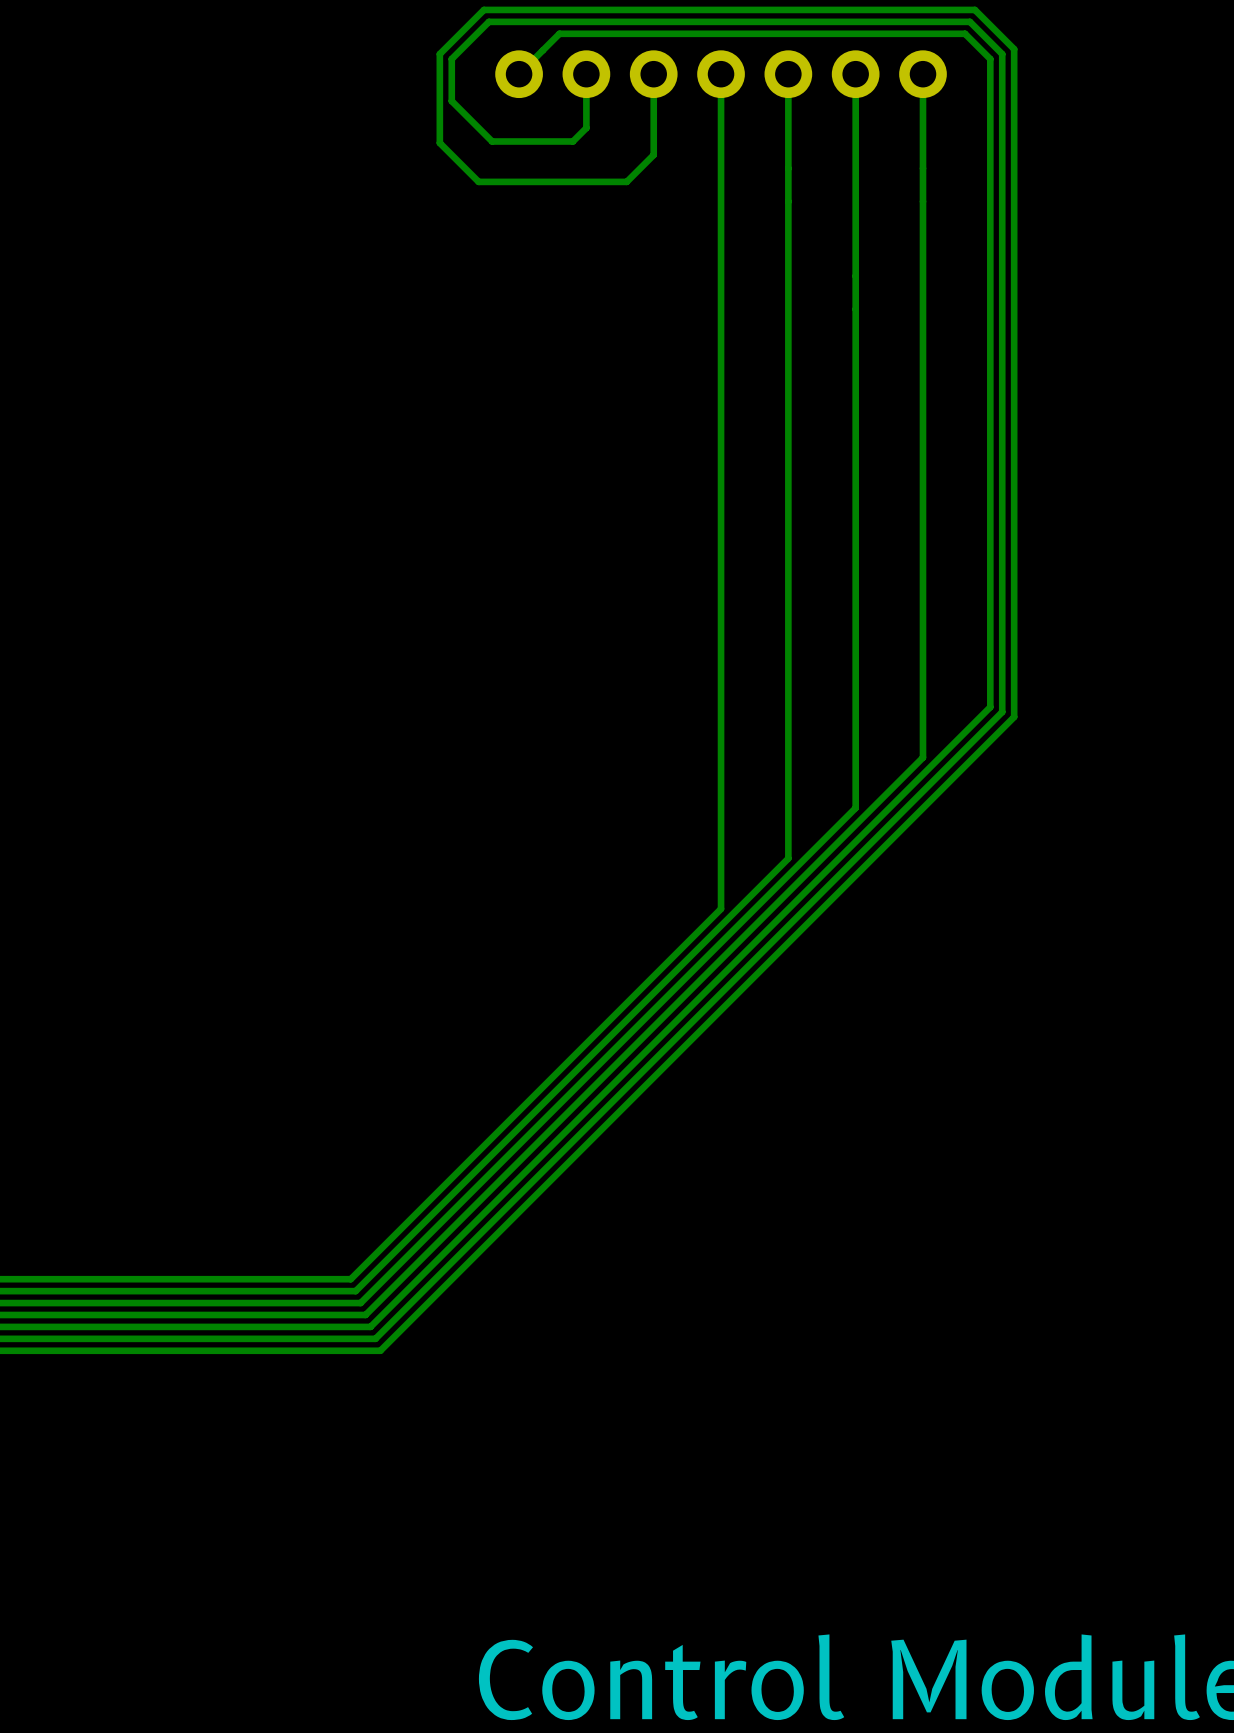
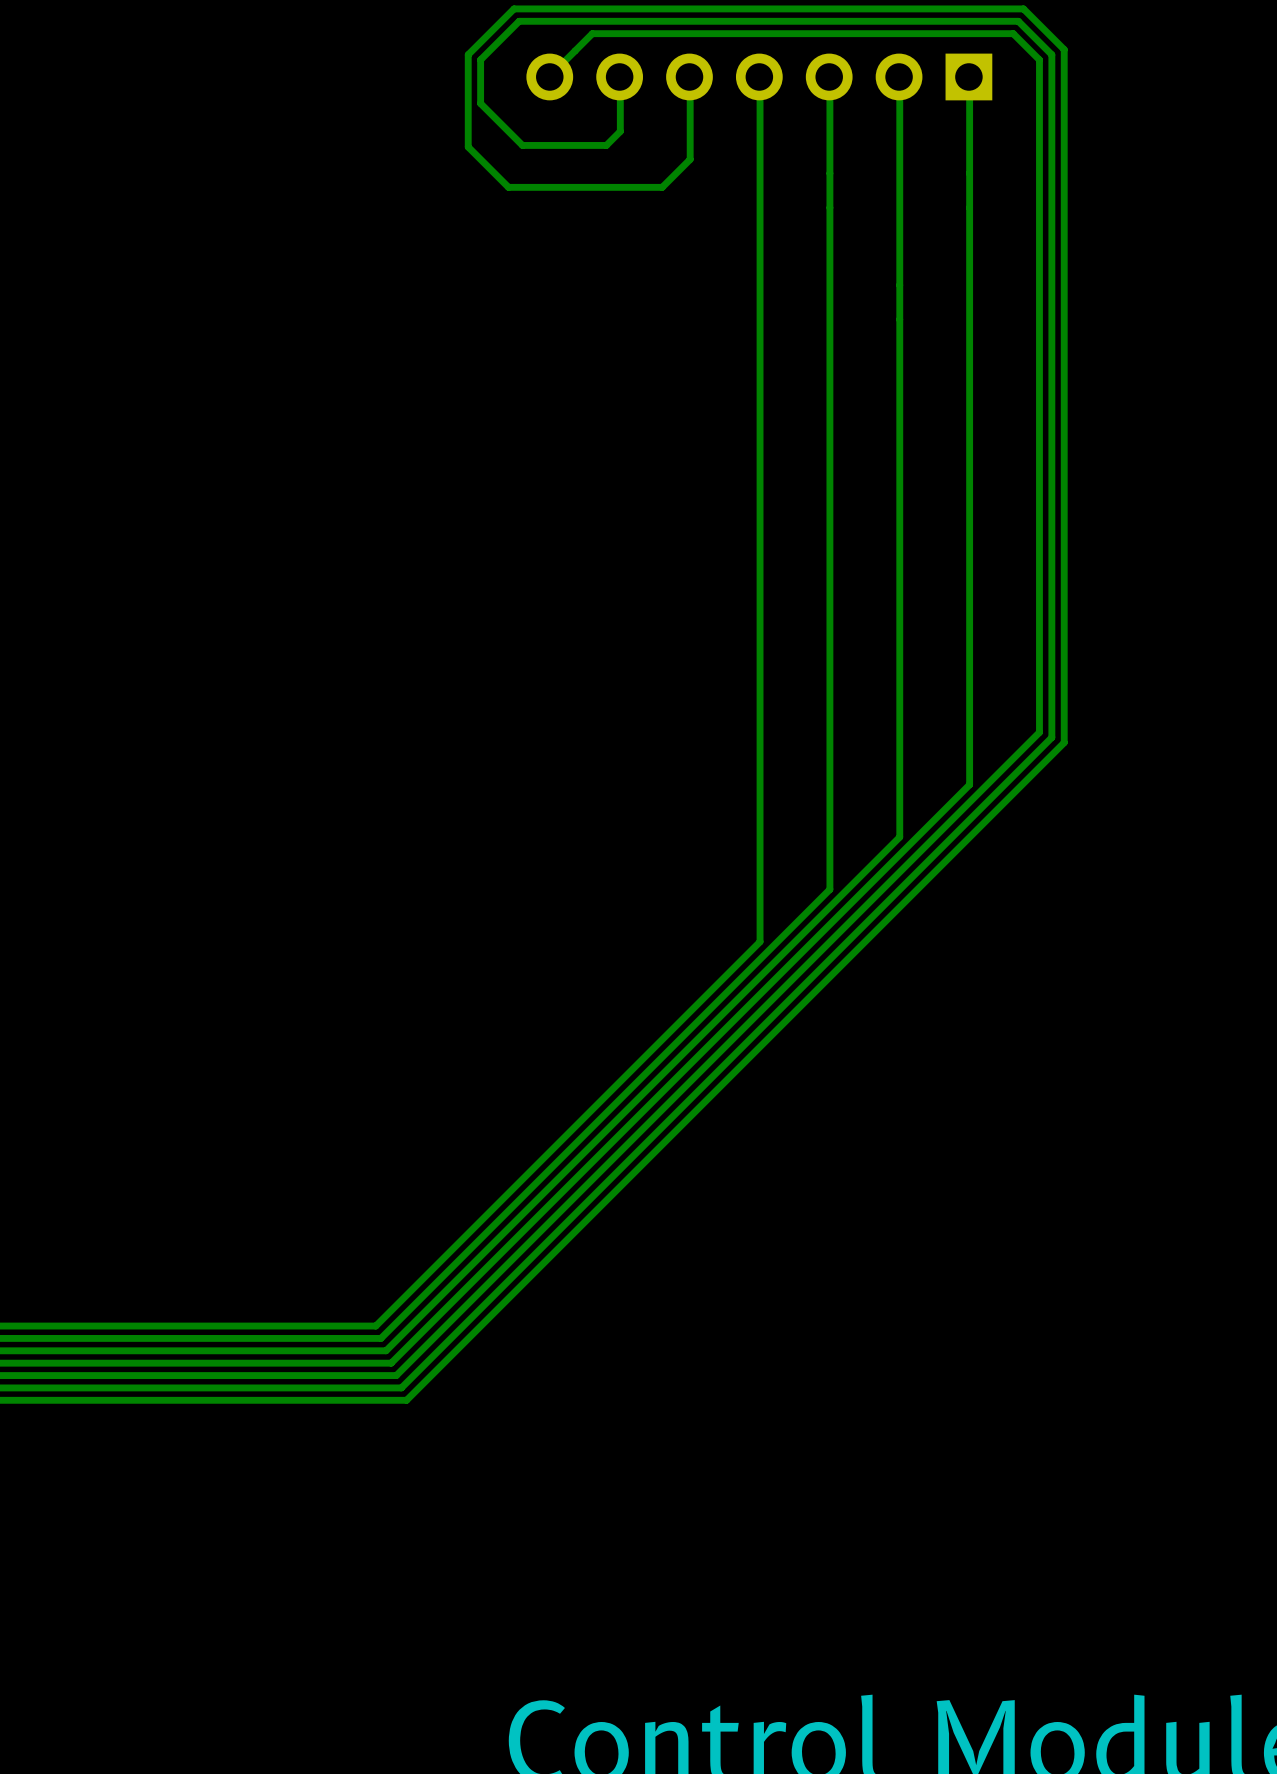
part footprint: [495, 50, 947, 99] -> [526, 53, 993, 101]

